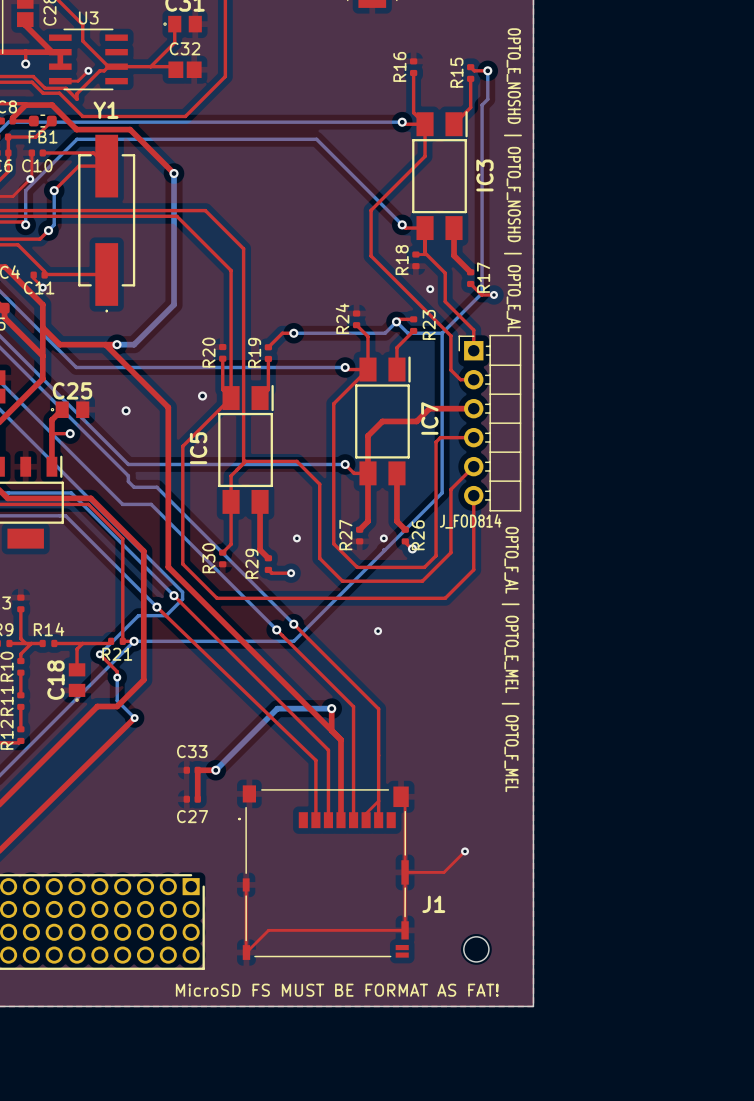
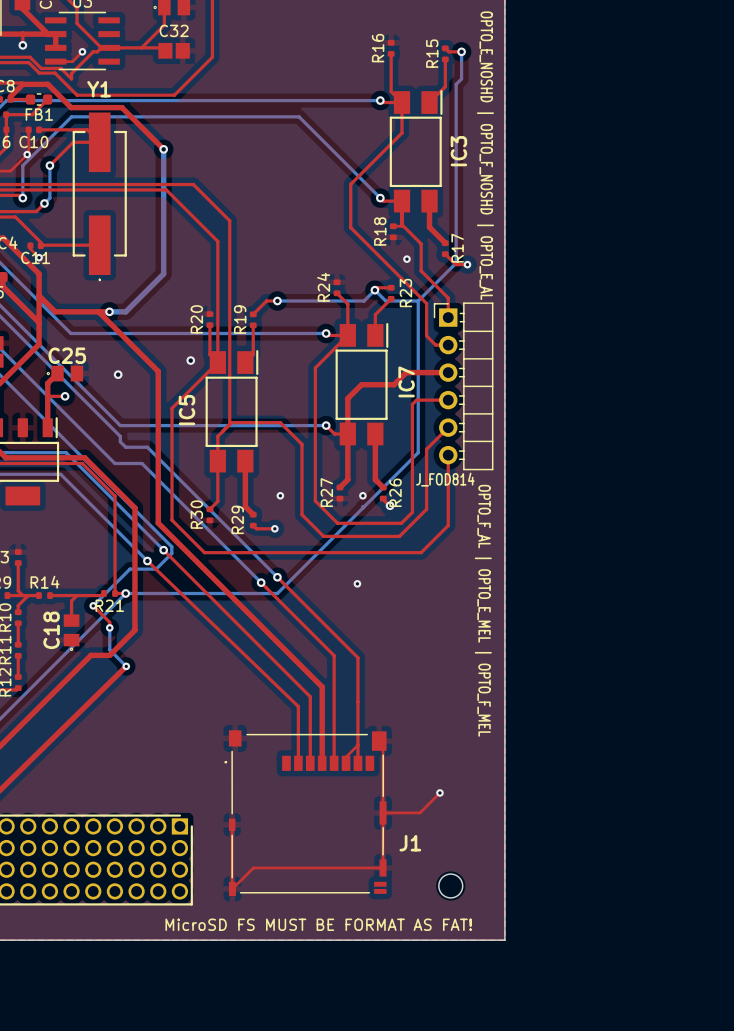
top track: (331, 708) (331, 730) -> none
bottom track: (331, 708) (277, 708) (215, 770) -> none
via: (331, 708) -> none
C33: (192, 770) -> none
top track: (215, 770) (197, 770) (197, 799) -> none
via: (215, 770) -> none
C27: (192, 799) -> none

